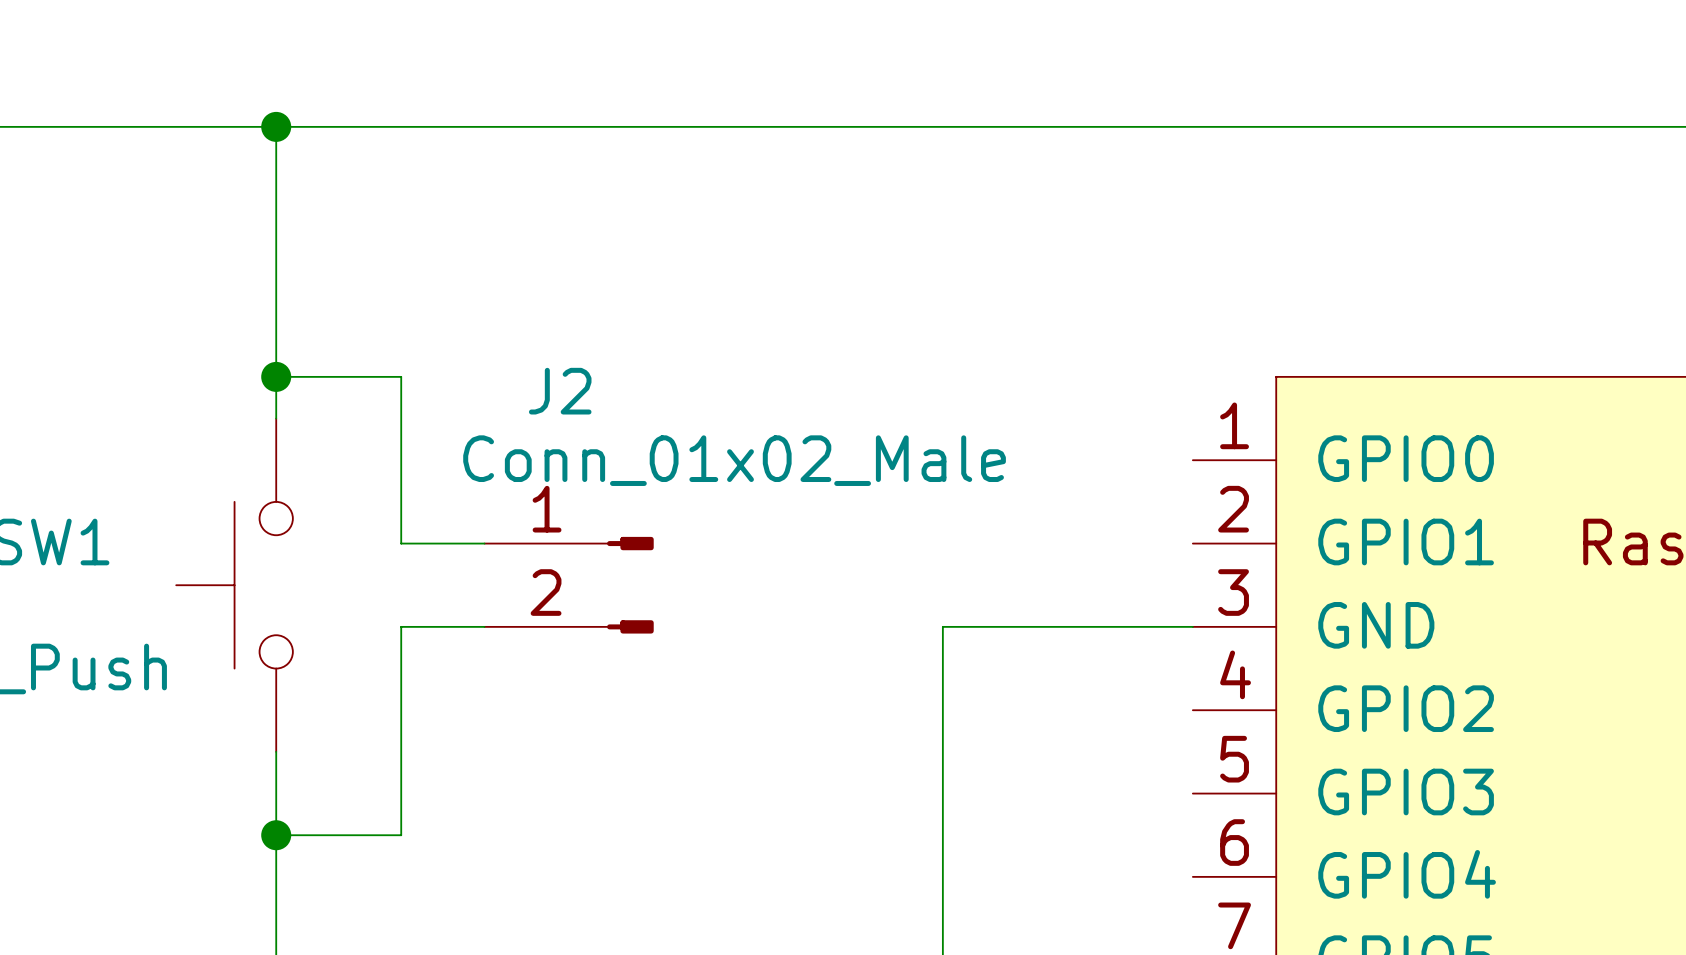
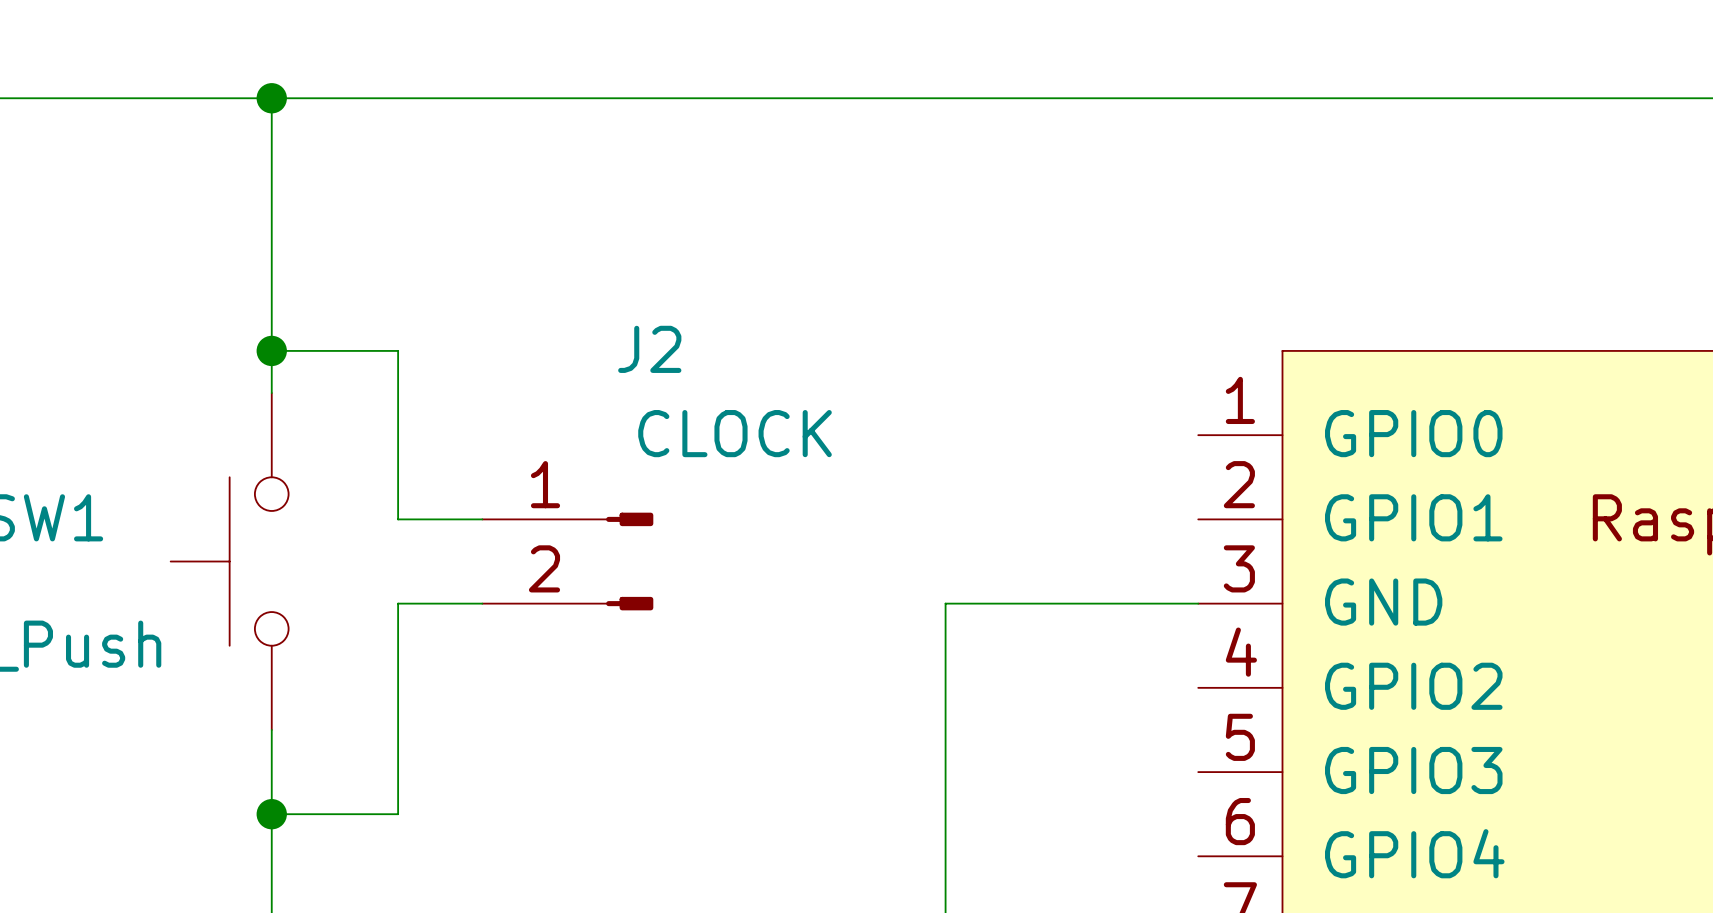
J2 name position: J2 (560, 391) -> J2 (649, 349)
J2 value: Conn_01x02_Male (734, 460) -> CLOCK (735, 433)

